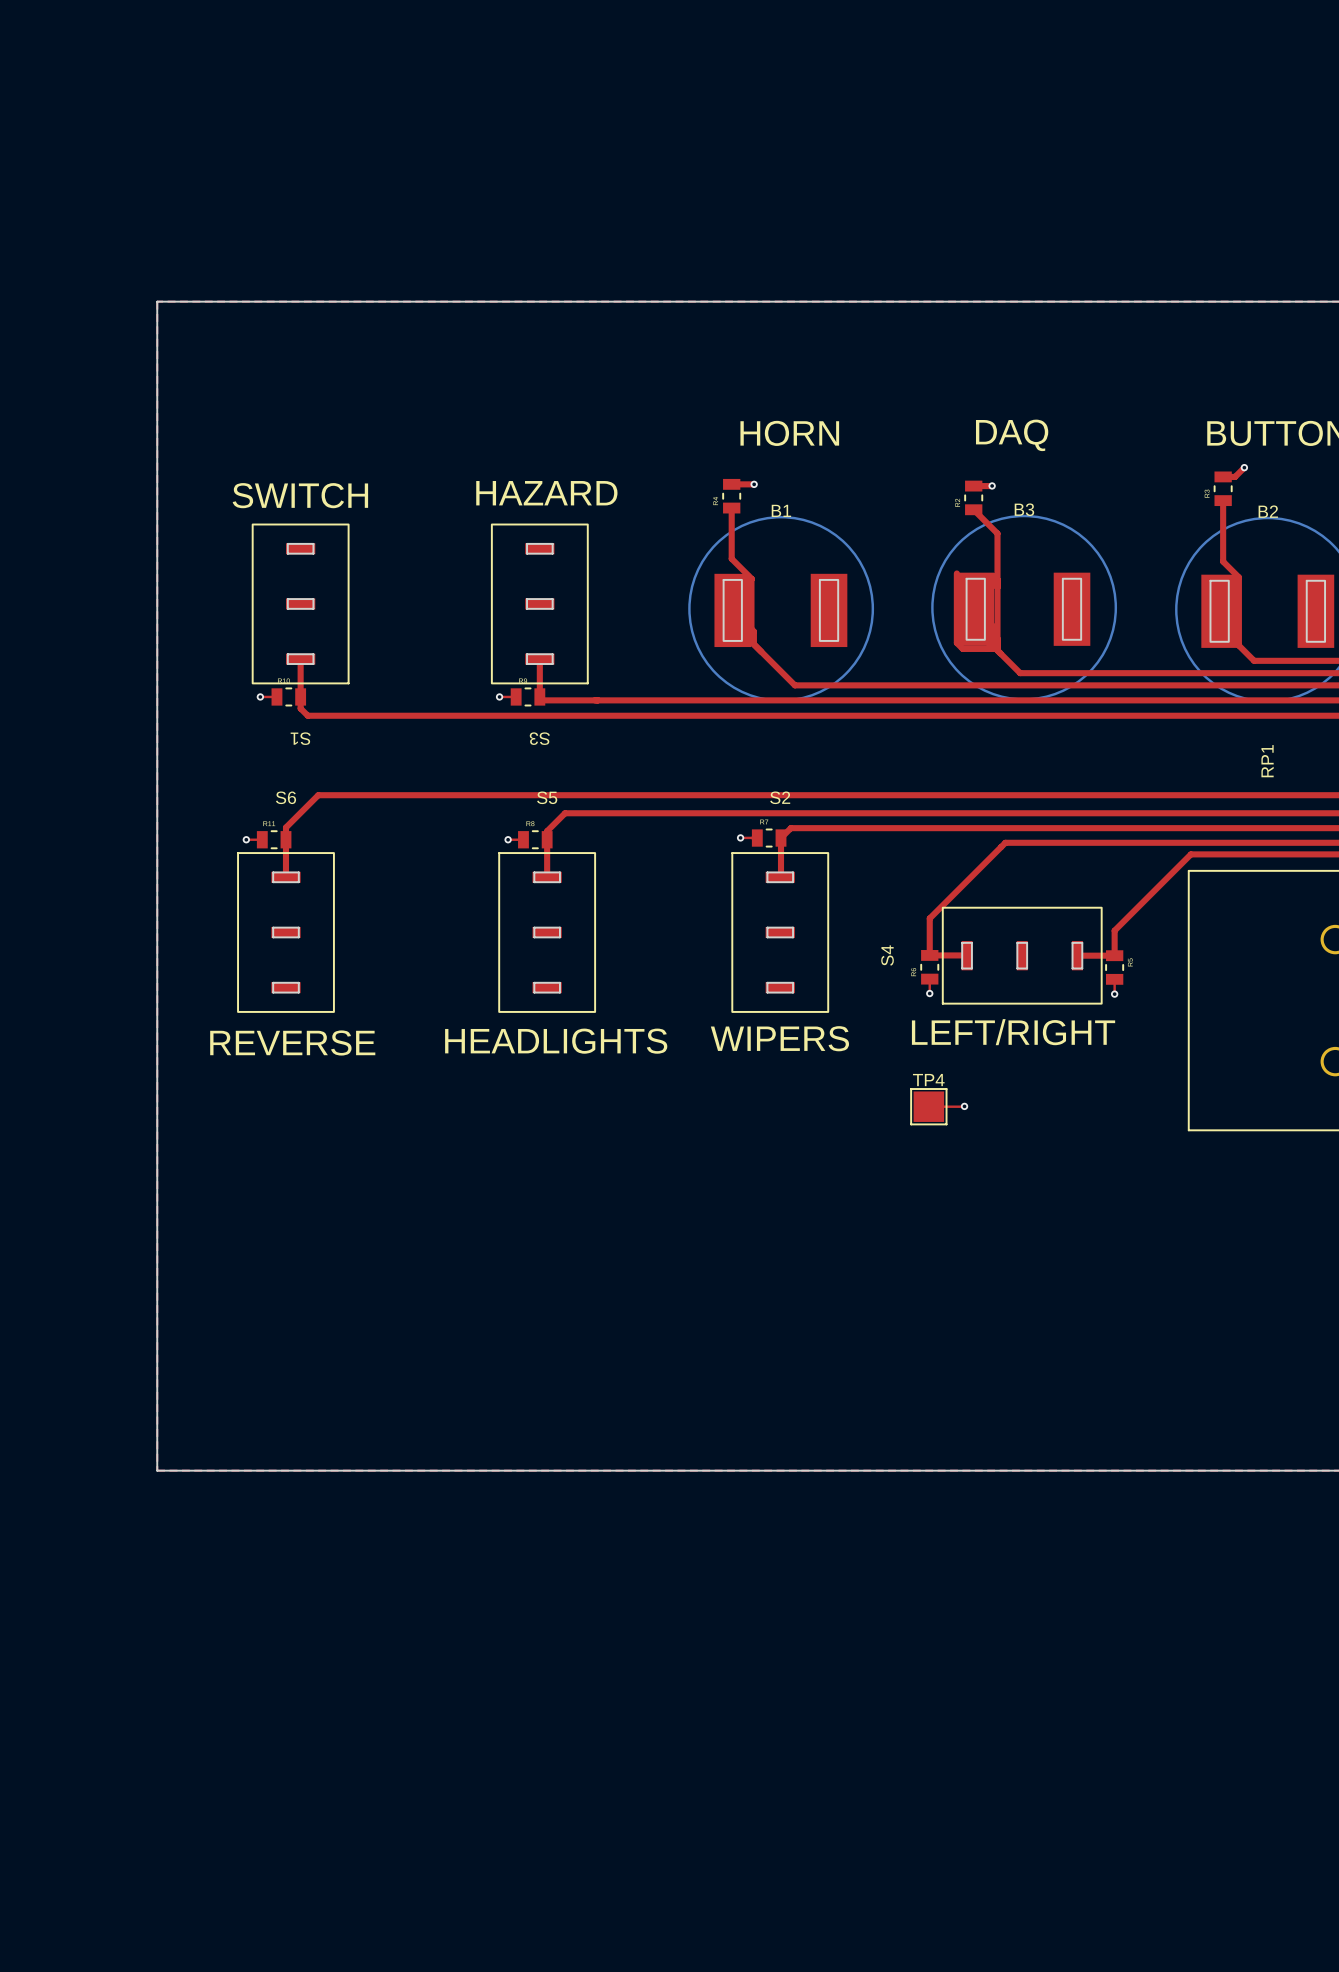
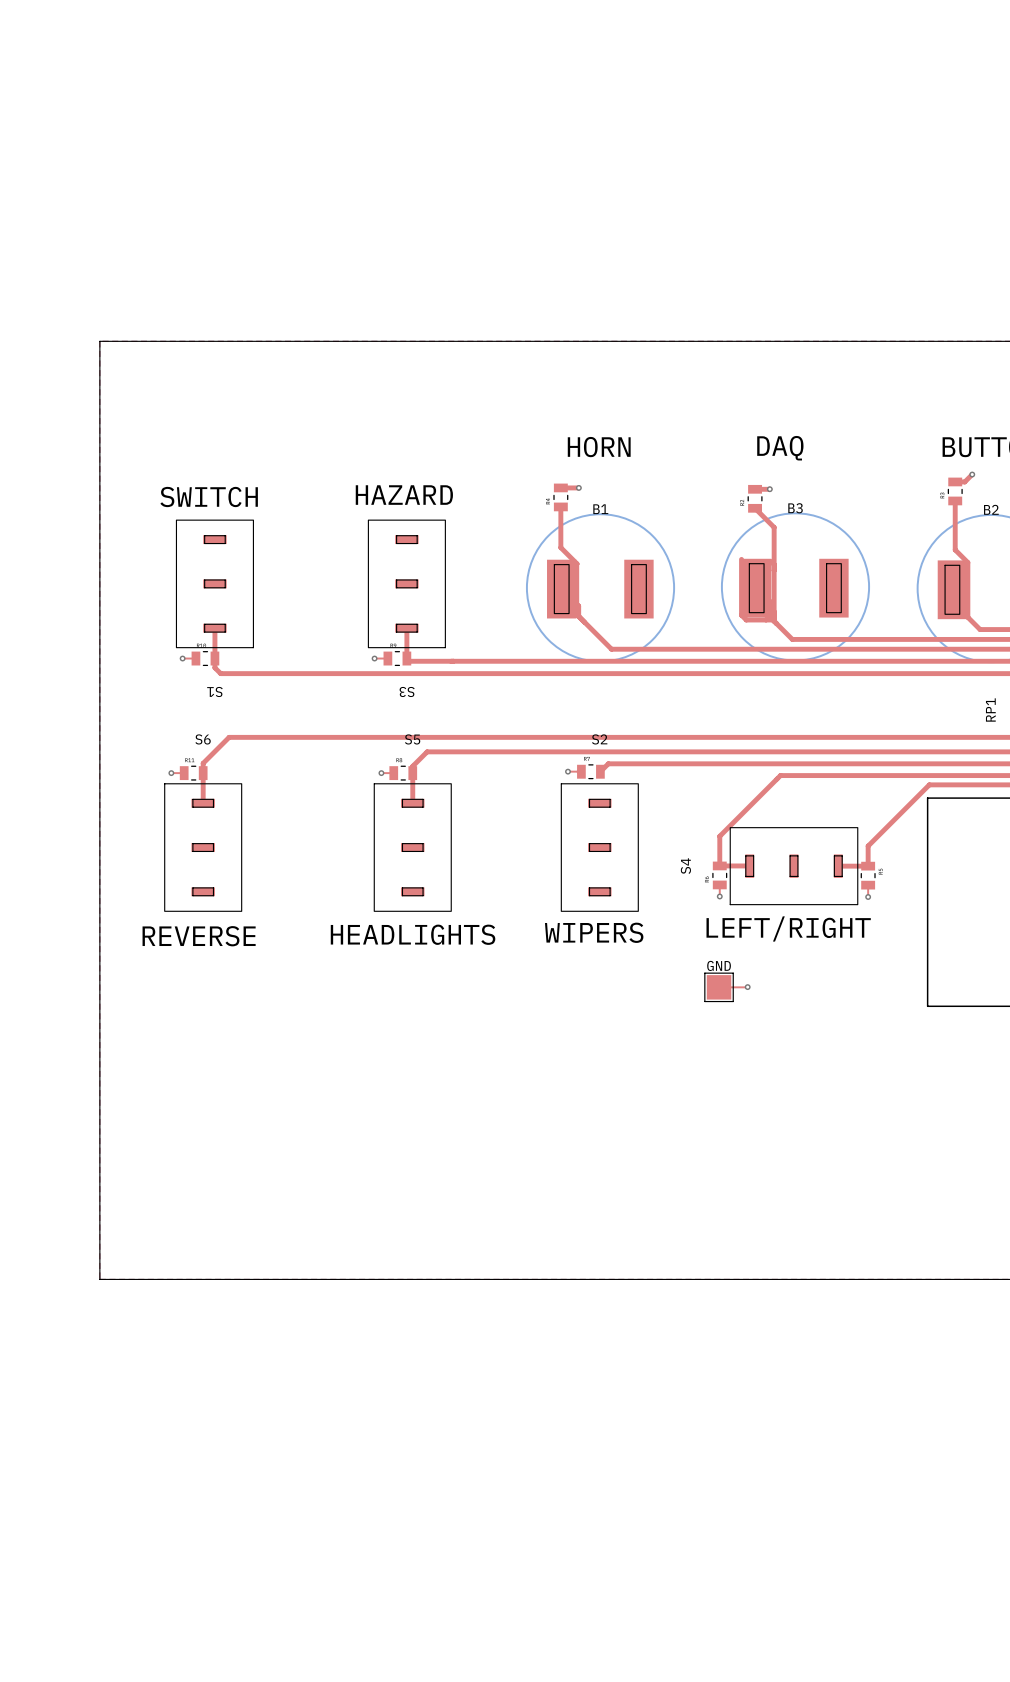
top track: (781, 838) (781, 876) (780, 877) (780, 875) (781, 873) (781, 873) -> none
TP4 name: TP4 (928, 1080) -> GND (719, 965)

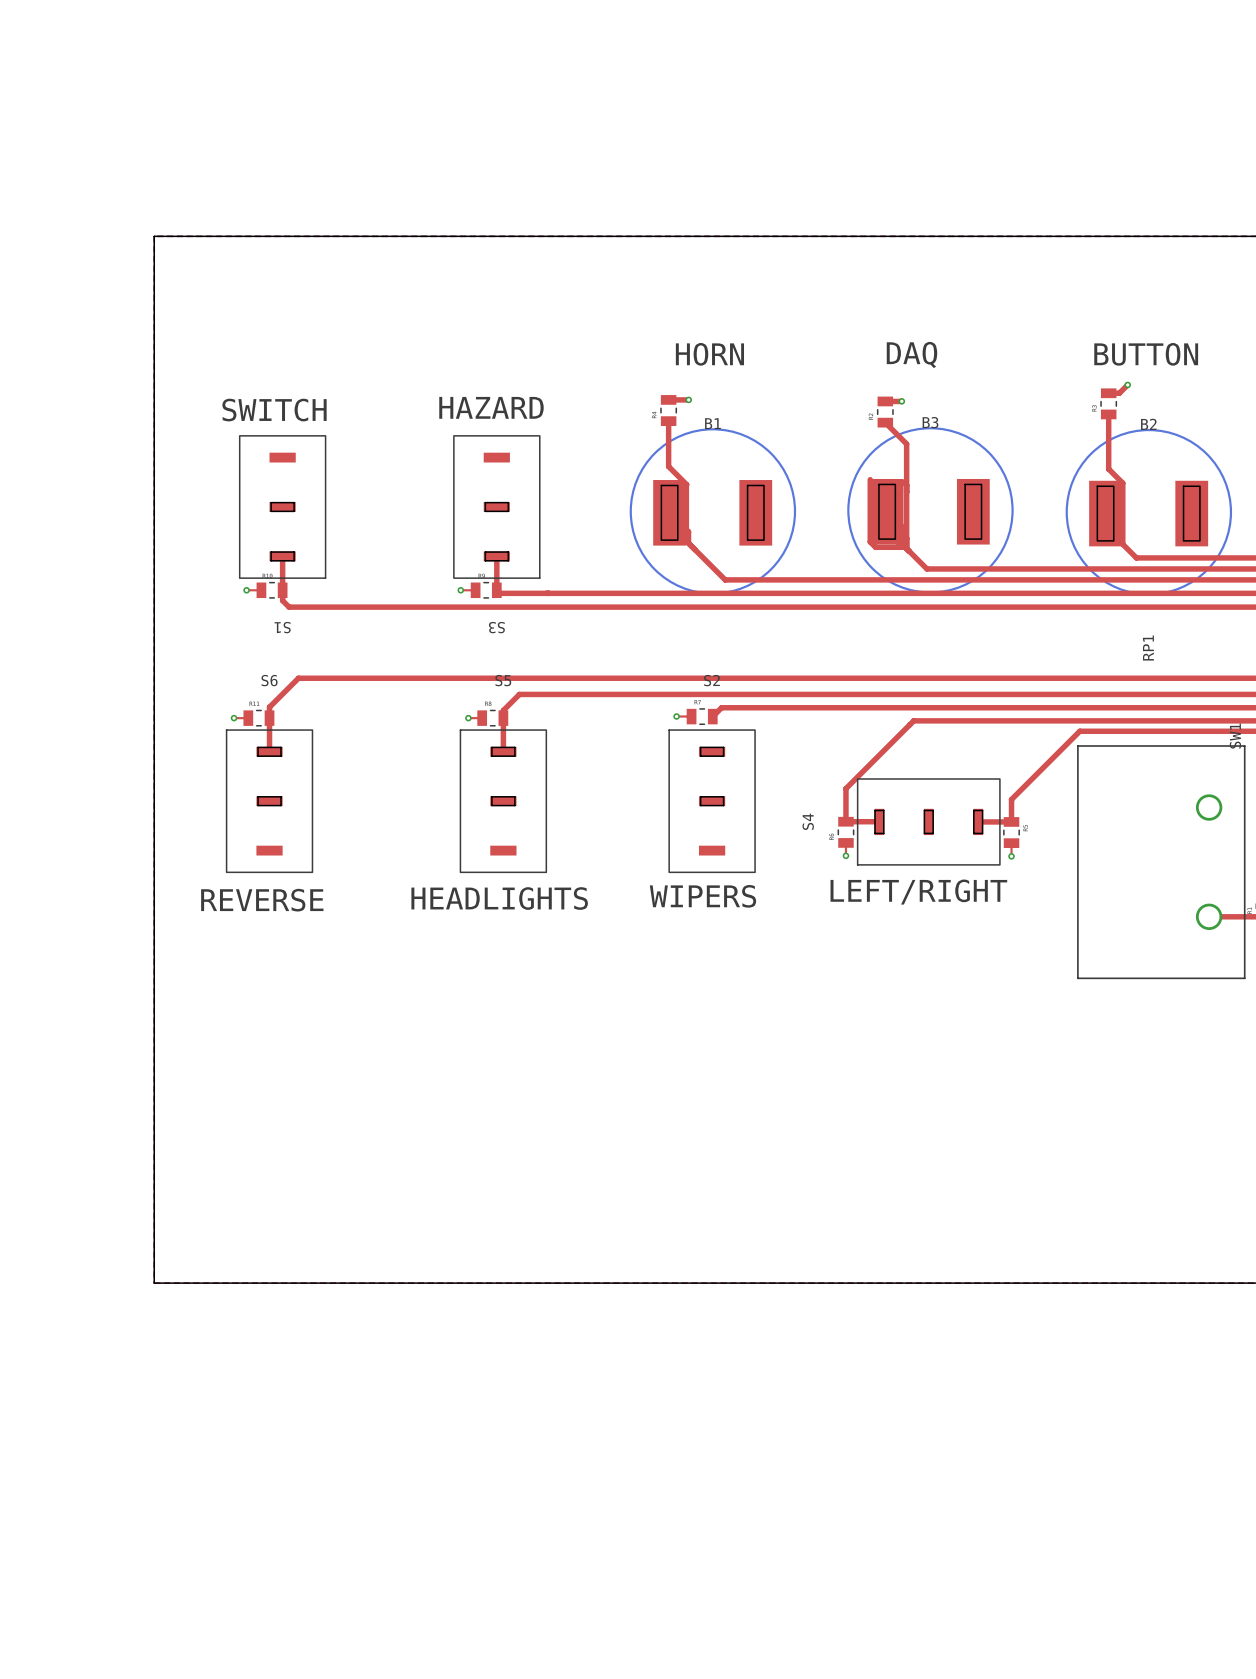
board edge: (204, 535) (204, 543) (225, 543) (225, 535) (204, 535) -> none
board edge: (396, 535) (396, 543) (417, 543) (417, 535) (396, 535) -> none
board edge: (192, 887) (192, 895) (213, 895) (213, 887) (192, 887) -> none
board edge: (402, 887) (423, 887) (423, 895) (402, 895) (402, 887) -> none
board edge: (589, 887) (589, 895) (610, 895) (610, 887) (589, 887) -> none
GND: (719, 987) -> none
top track: (747, 987) (719, 987) -> none
via: (747, 987) -> none

